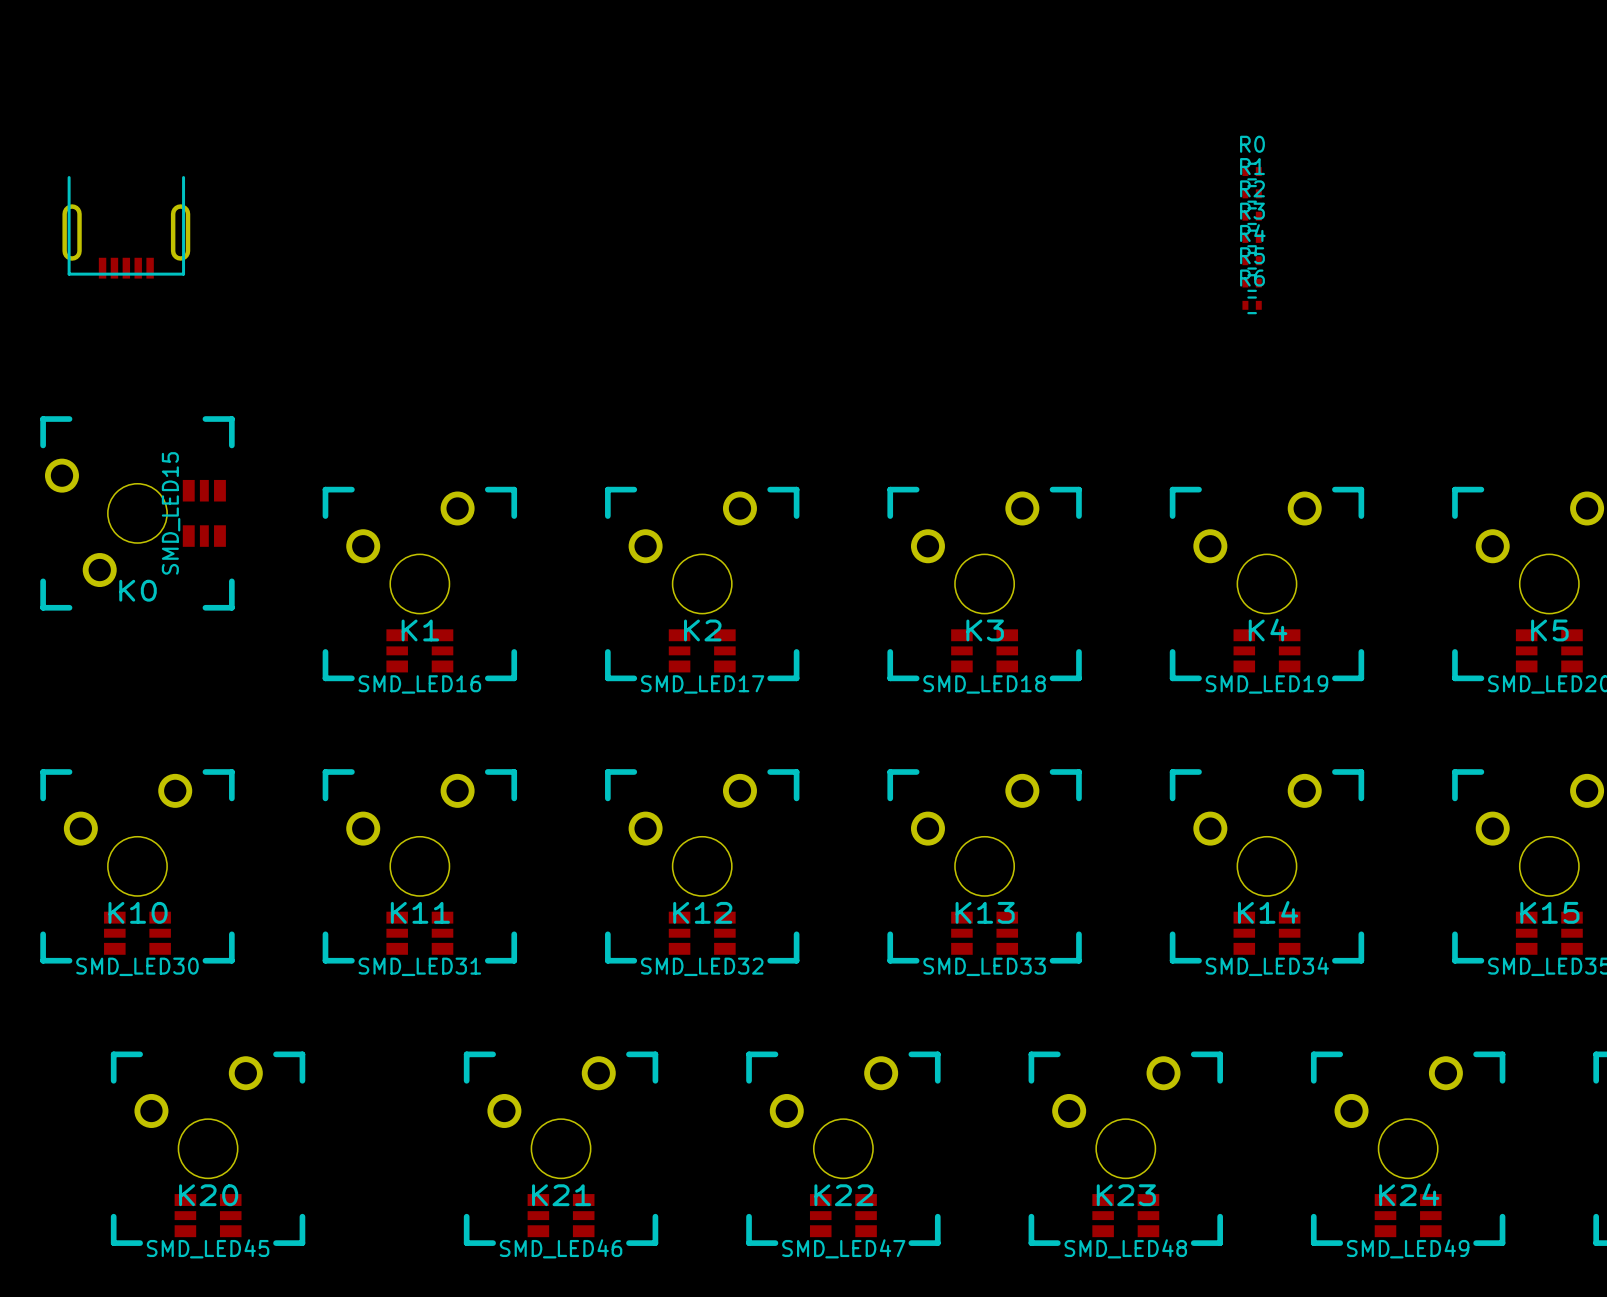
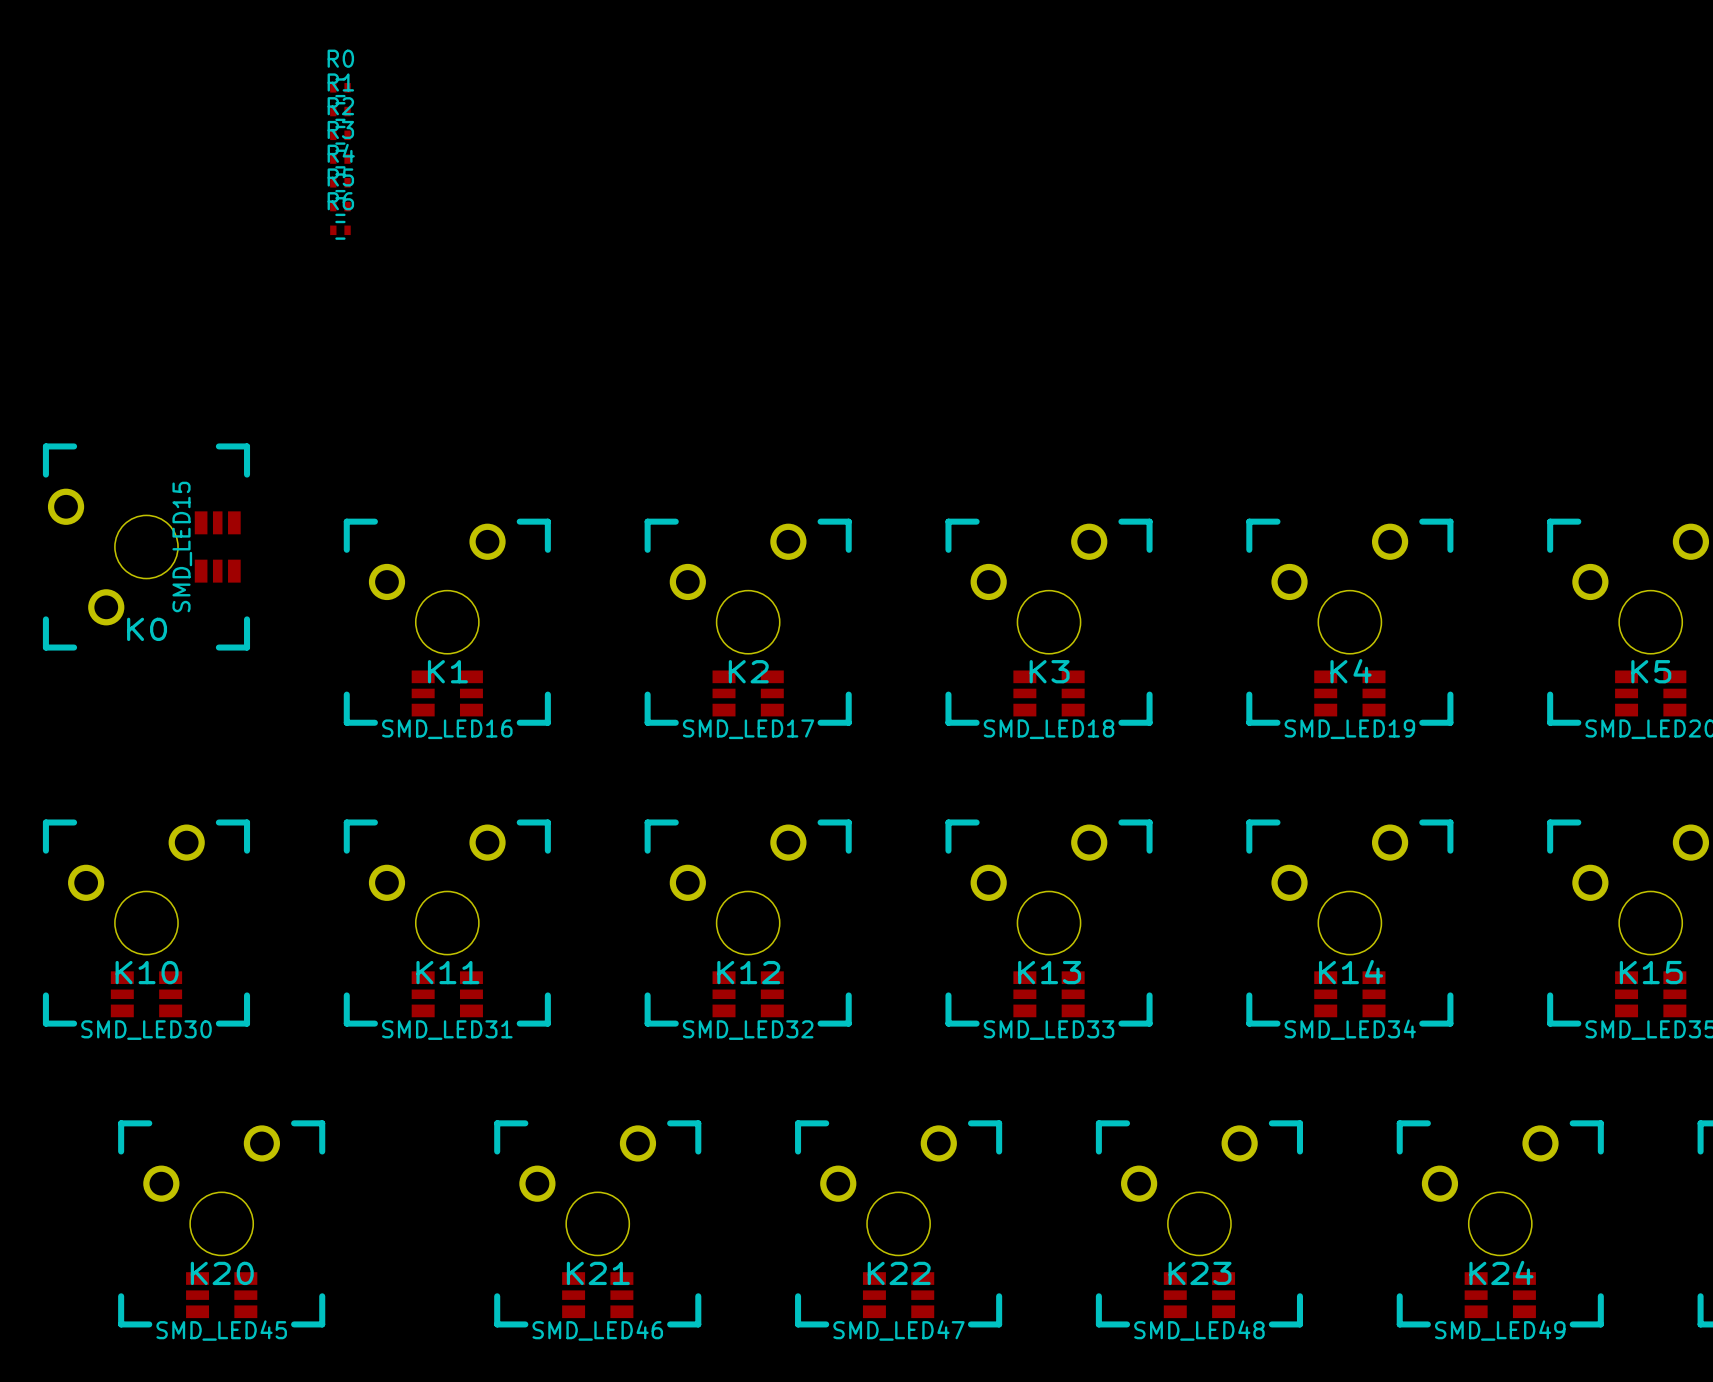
R0 position: (1252, 171) -> (340, 87)
R1 position: (1252, 193) -> (340, 111)
R2 position: (1252, 216) -> (340, 135)
part: (126, 227) -> none
R3 position: (1252, 238) -> (340, 159)
R4 position: (1252, 260) -> (340, 182)
R5 position: (1252, 283) -> (340, 206)
R6 position: (1252, 305) -> (340, 230)

